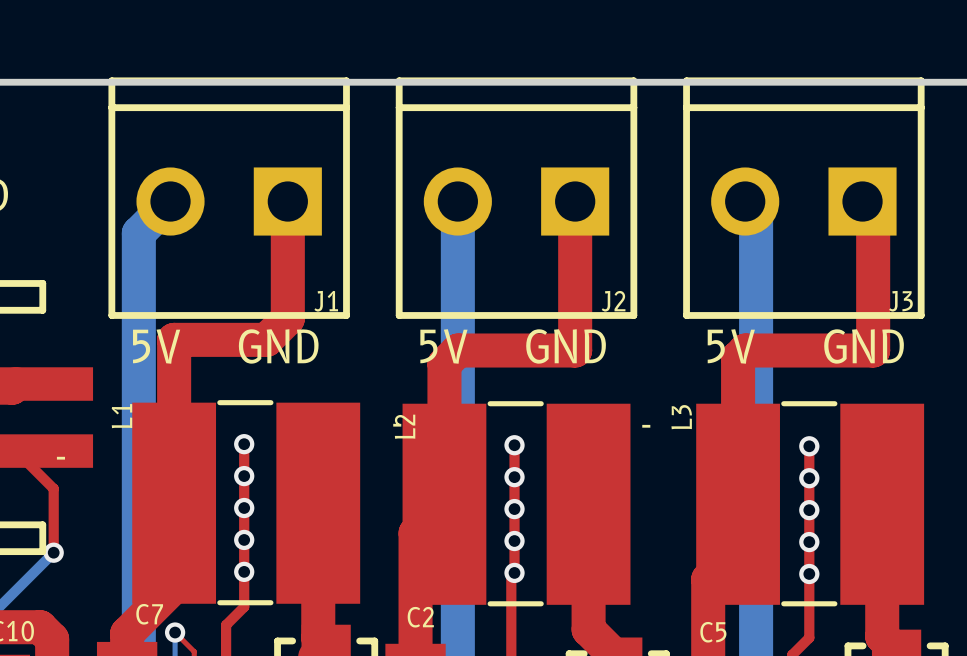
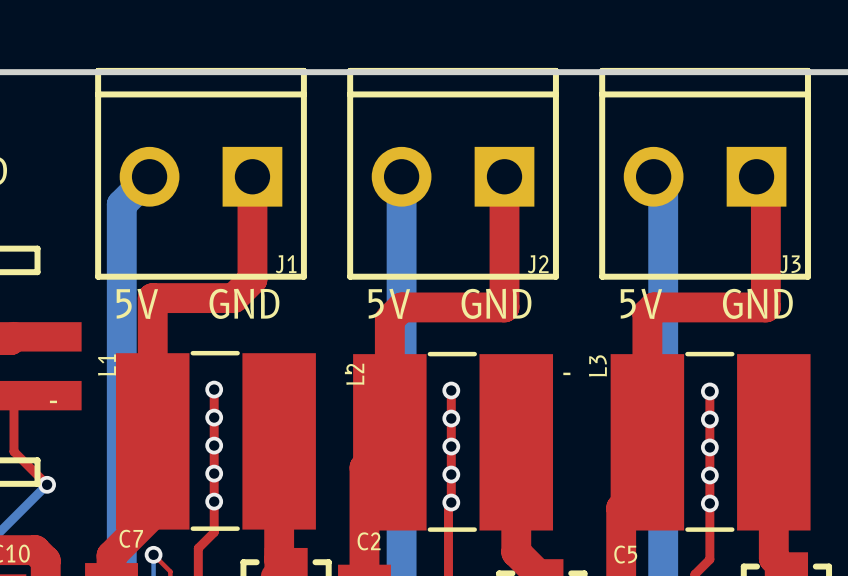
top track: (15, 451) (53, 488) (53, 552) -> (13, 395) (13, 451) (47, 484)

